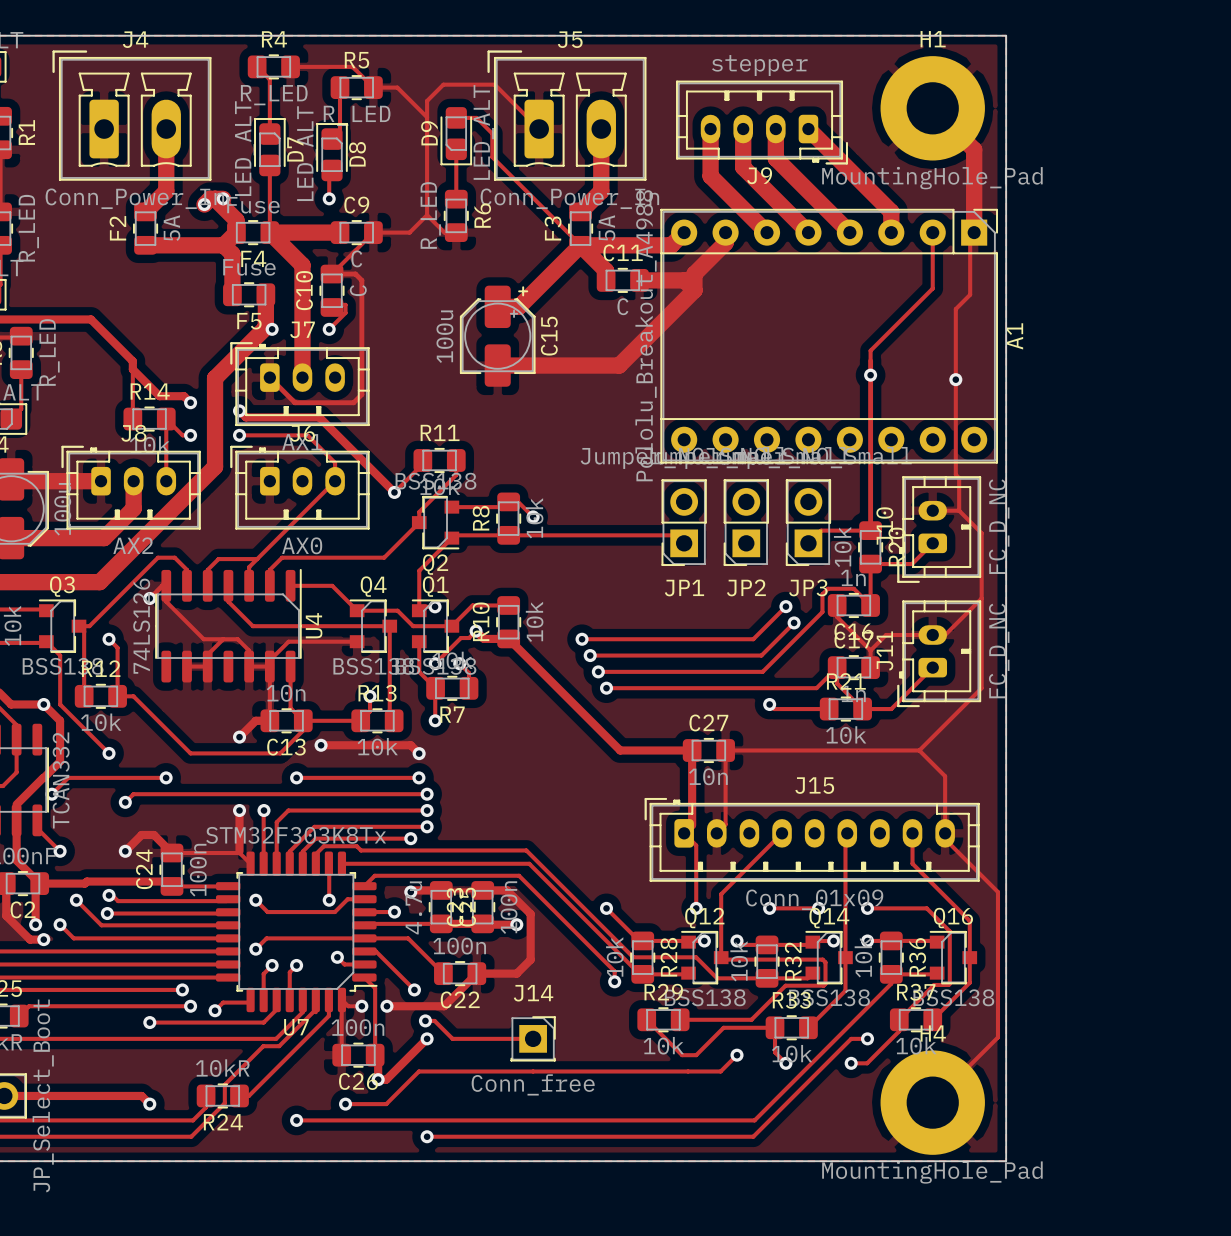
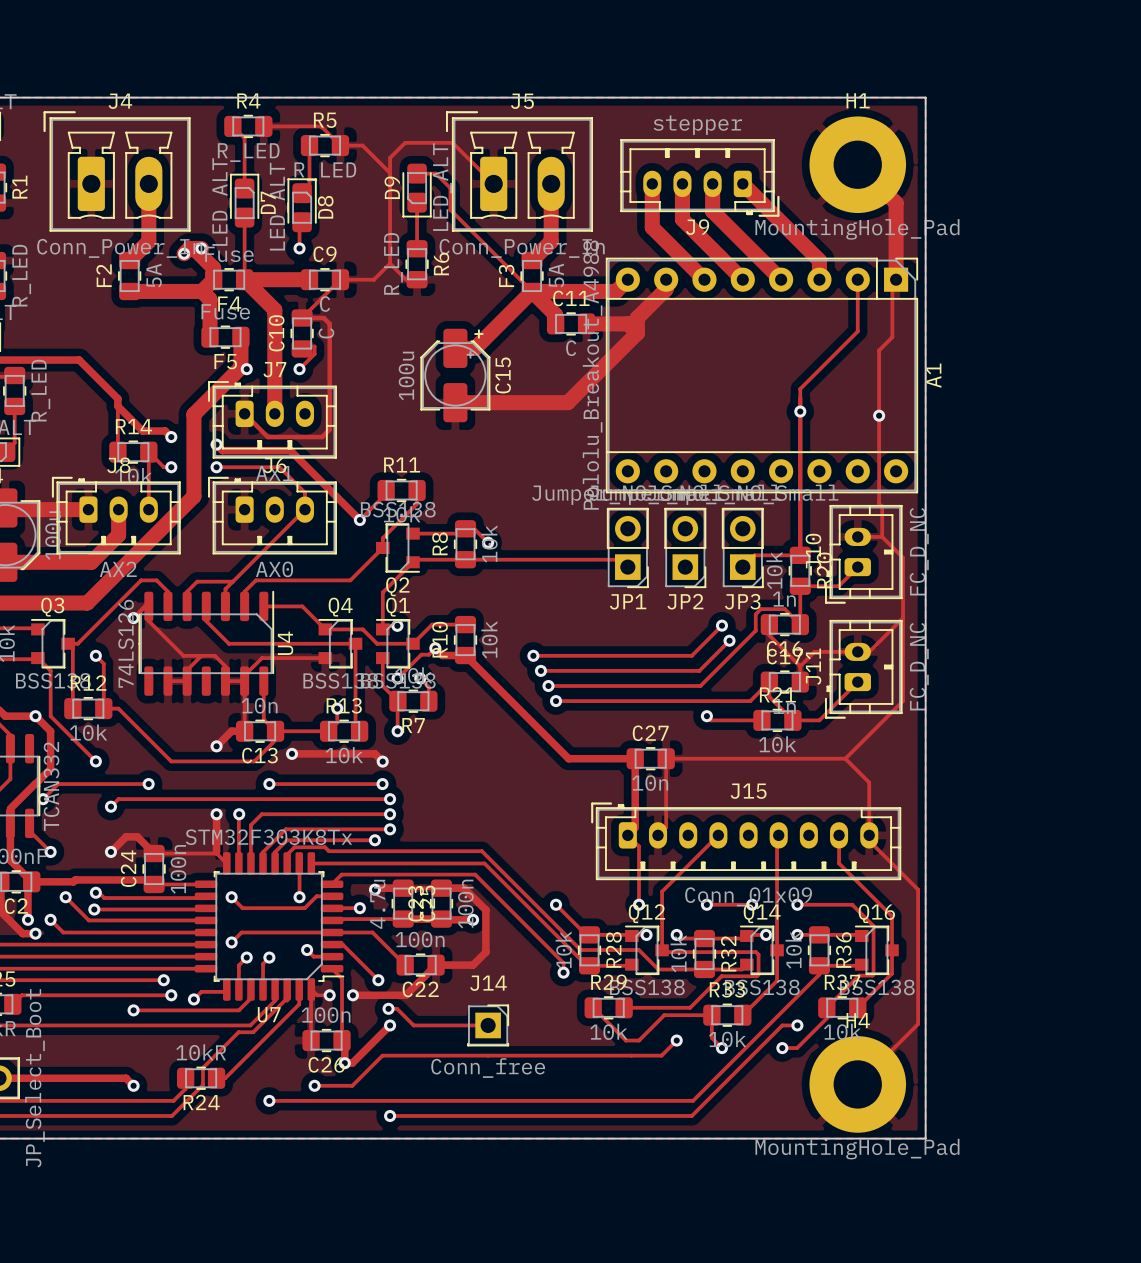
JP1 footprint: [661, 479, 707, 567] -> [606, 507, 649, 589]
JP2 footprint: [723, 479, 769, 567] -> [664, 507, 707, 589]
JP3 footprint: [785, 479, 832, 567] -> [721, 507, 764, 589]

